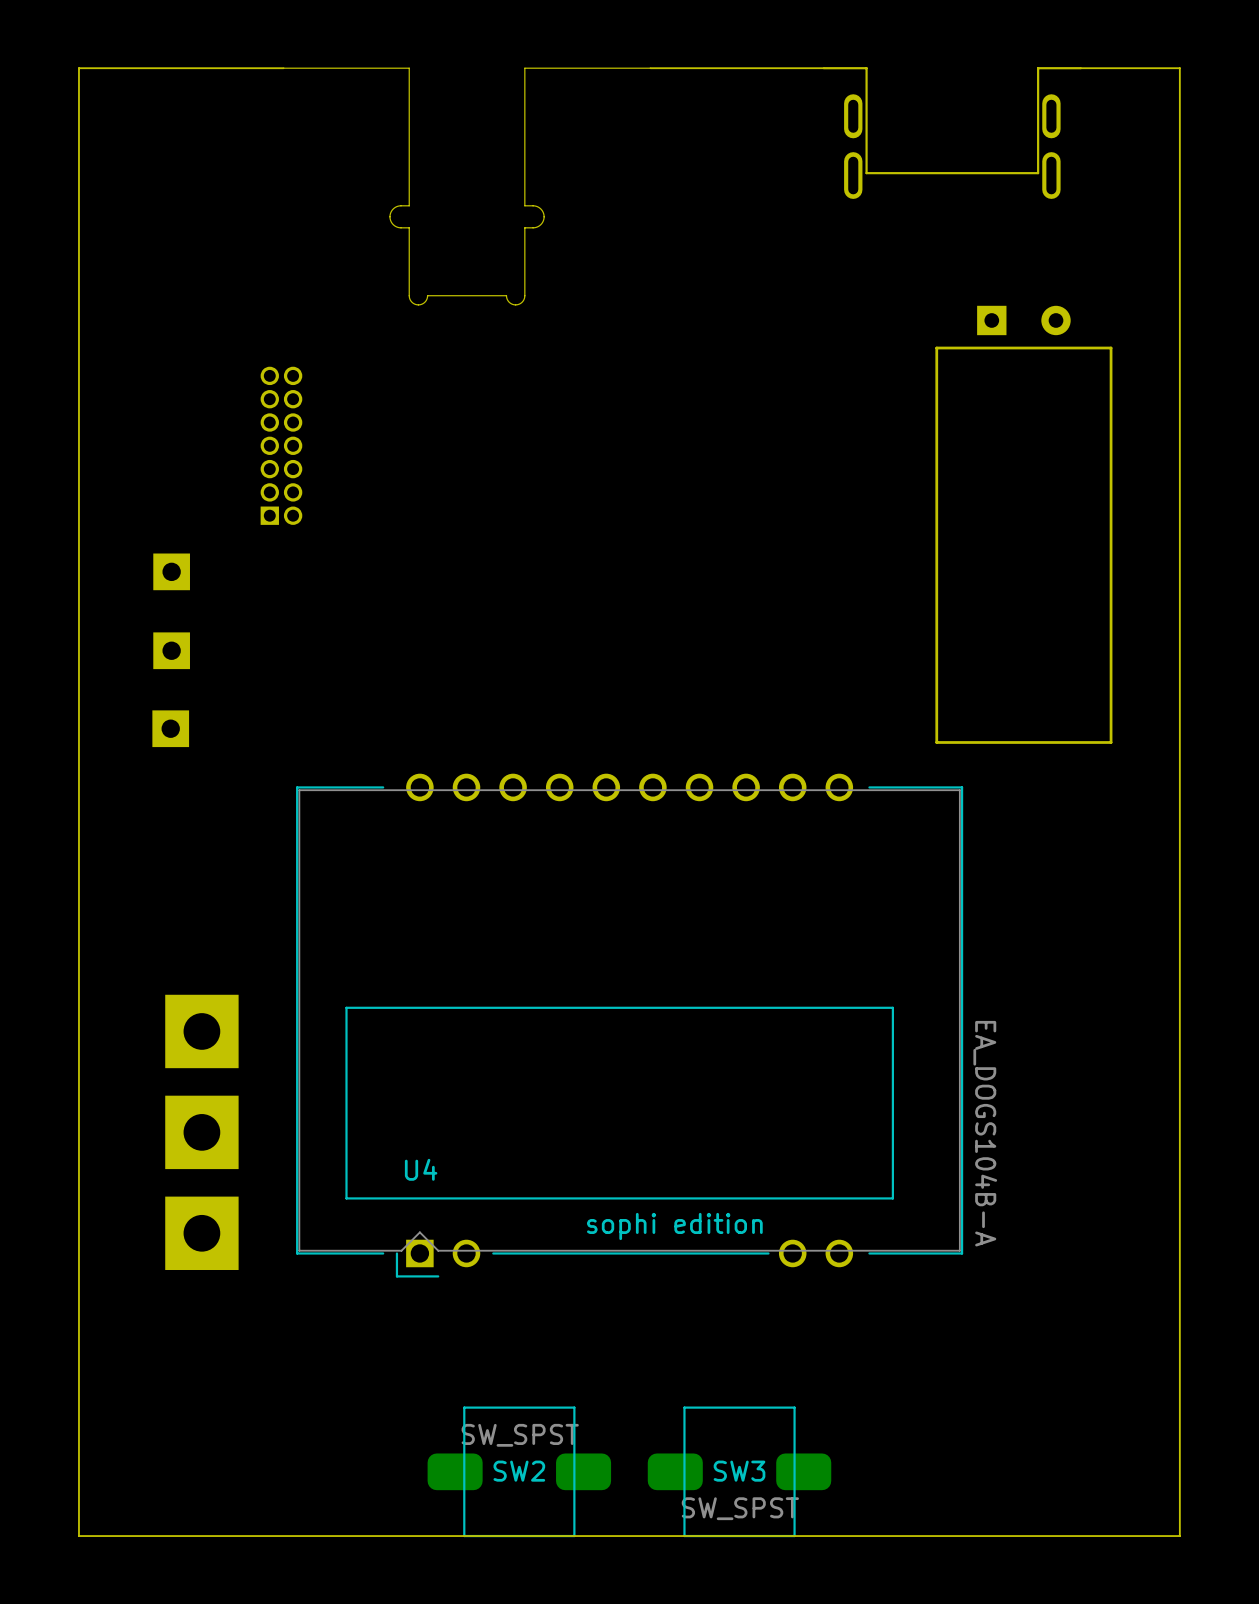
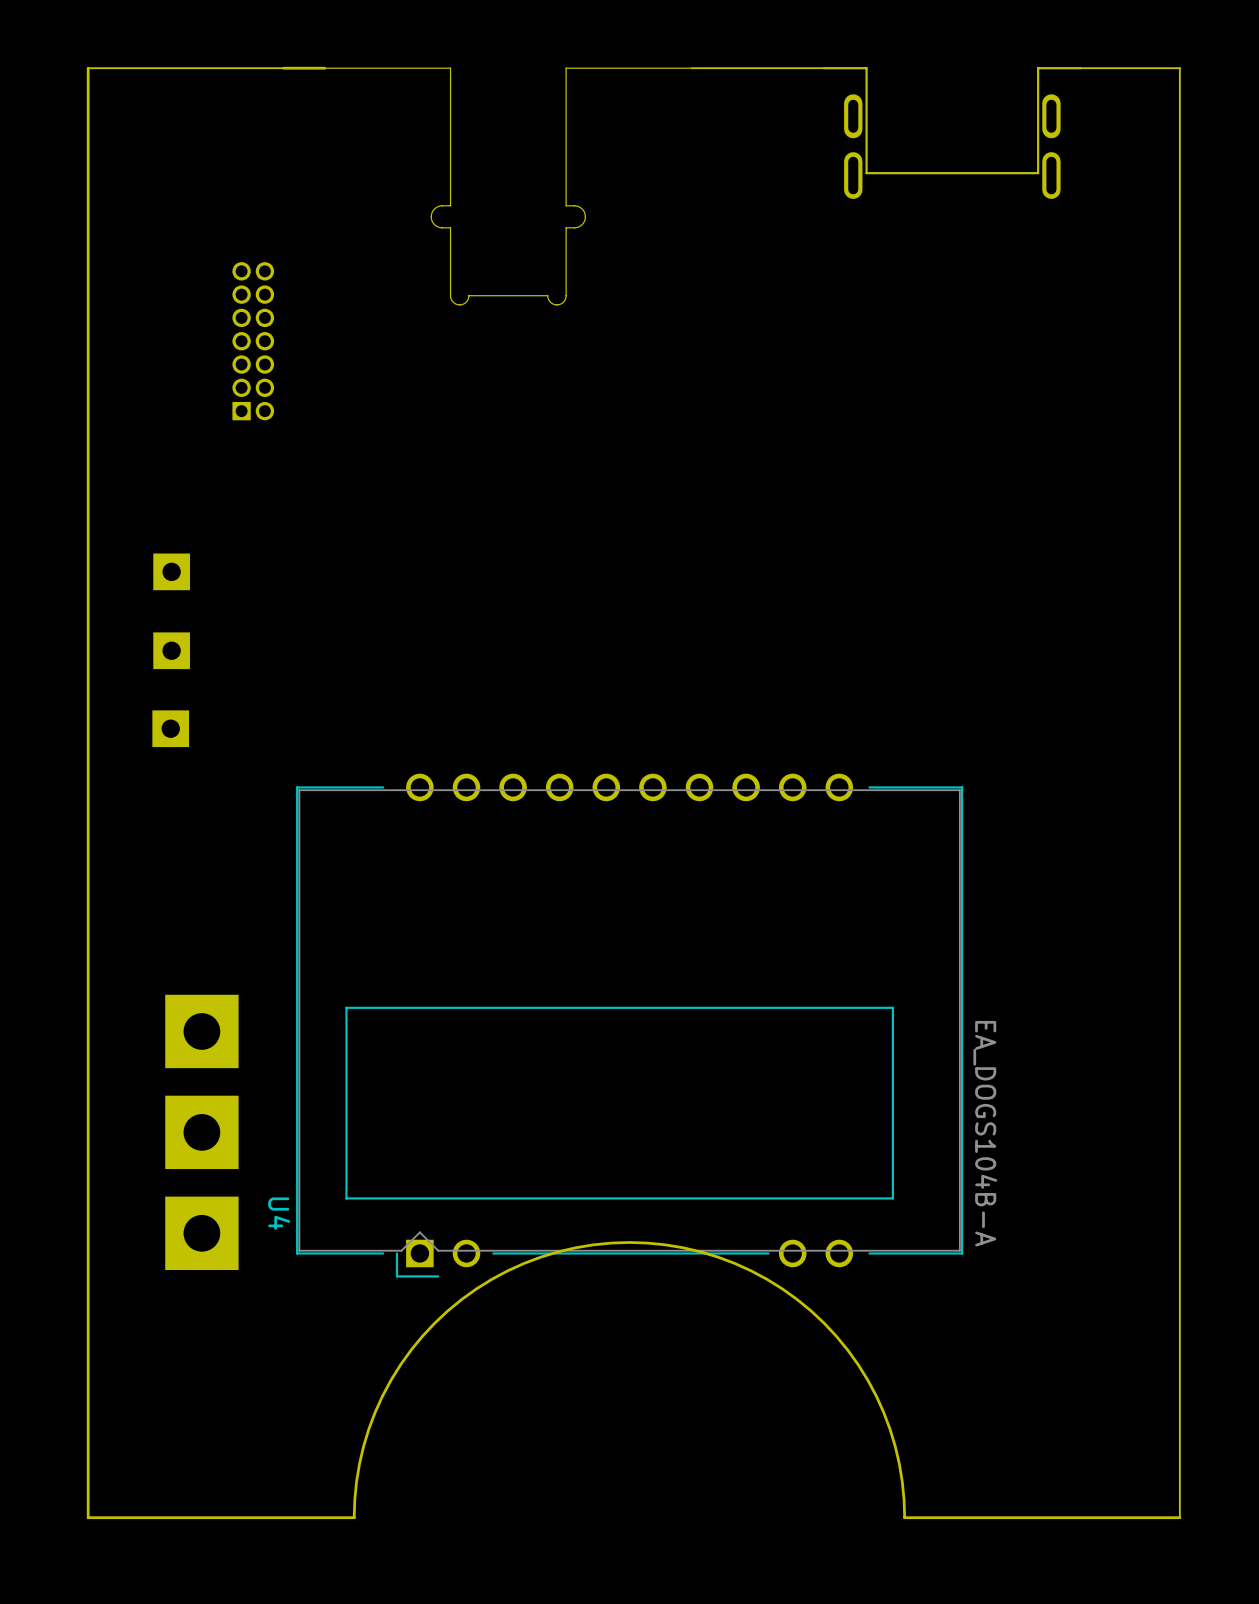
board edge: (88, 68) (78, 68) (78, 1536) (1179, 1536) (1179, 1517) -> (88, 68) (88, 1517) (354, 1517) (359, 1464) (375, 1412) (400, 1364) (434, 1323) (476, 1288) (524, 1263) (575, 1247) (629, 1242) (683, 1247) (734, 1263) (782, 1288) (824, 1323) (858, 1364) (883, 1412) (899, 1464) (904, 1517) (1179, 1517)
board edge: (691, 68) (650, 68) -> (324, 68) (283, 68)
part position: (467, 186) -> (508, 186)
part: (1023, 320) -> none
board edge: (1111, 348) (1111, 742) (936, 742) (936, 348) (1111, 348) -> none
part position: (281, 445) -> (253, 341)
U4 name rotation: 0° (421, 1169) -> 90° clockwise (279, 1213)
U4 name position: U4 (421, 1169) -> U4 (279, 1213)
text: sophi edition (674, 1226) -> none
SW2: SW_SPST (519, 1471) -> none
SW3: SW_SPST (739, 1471) -> none

